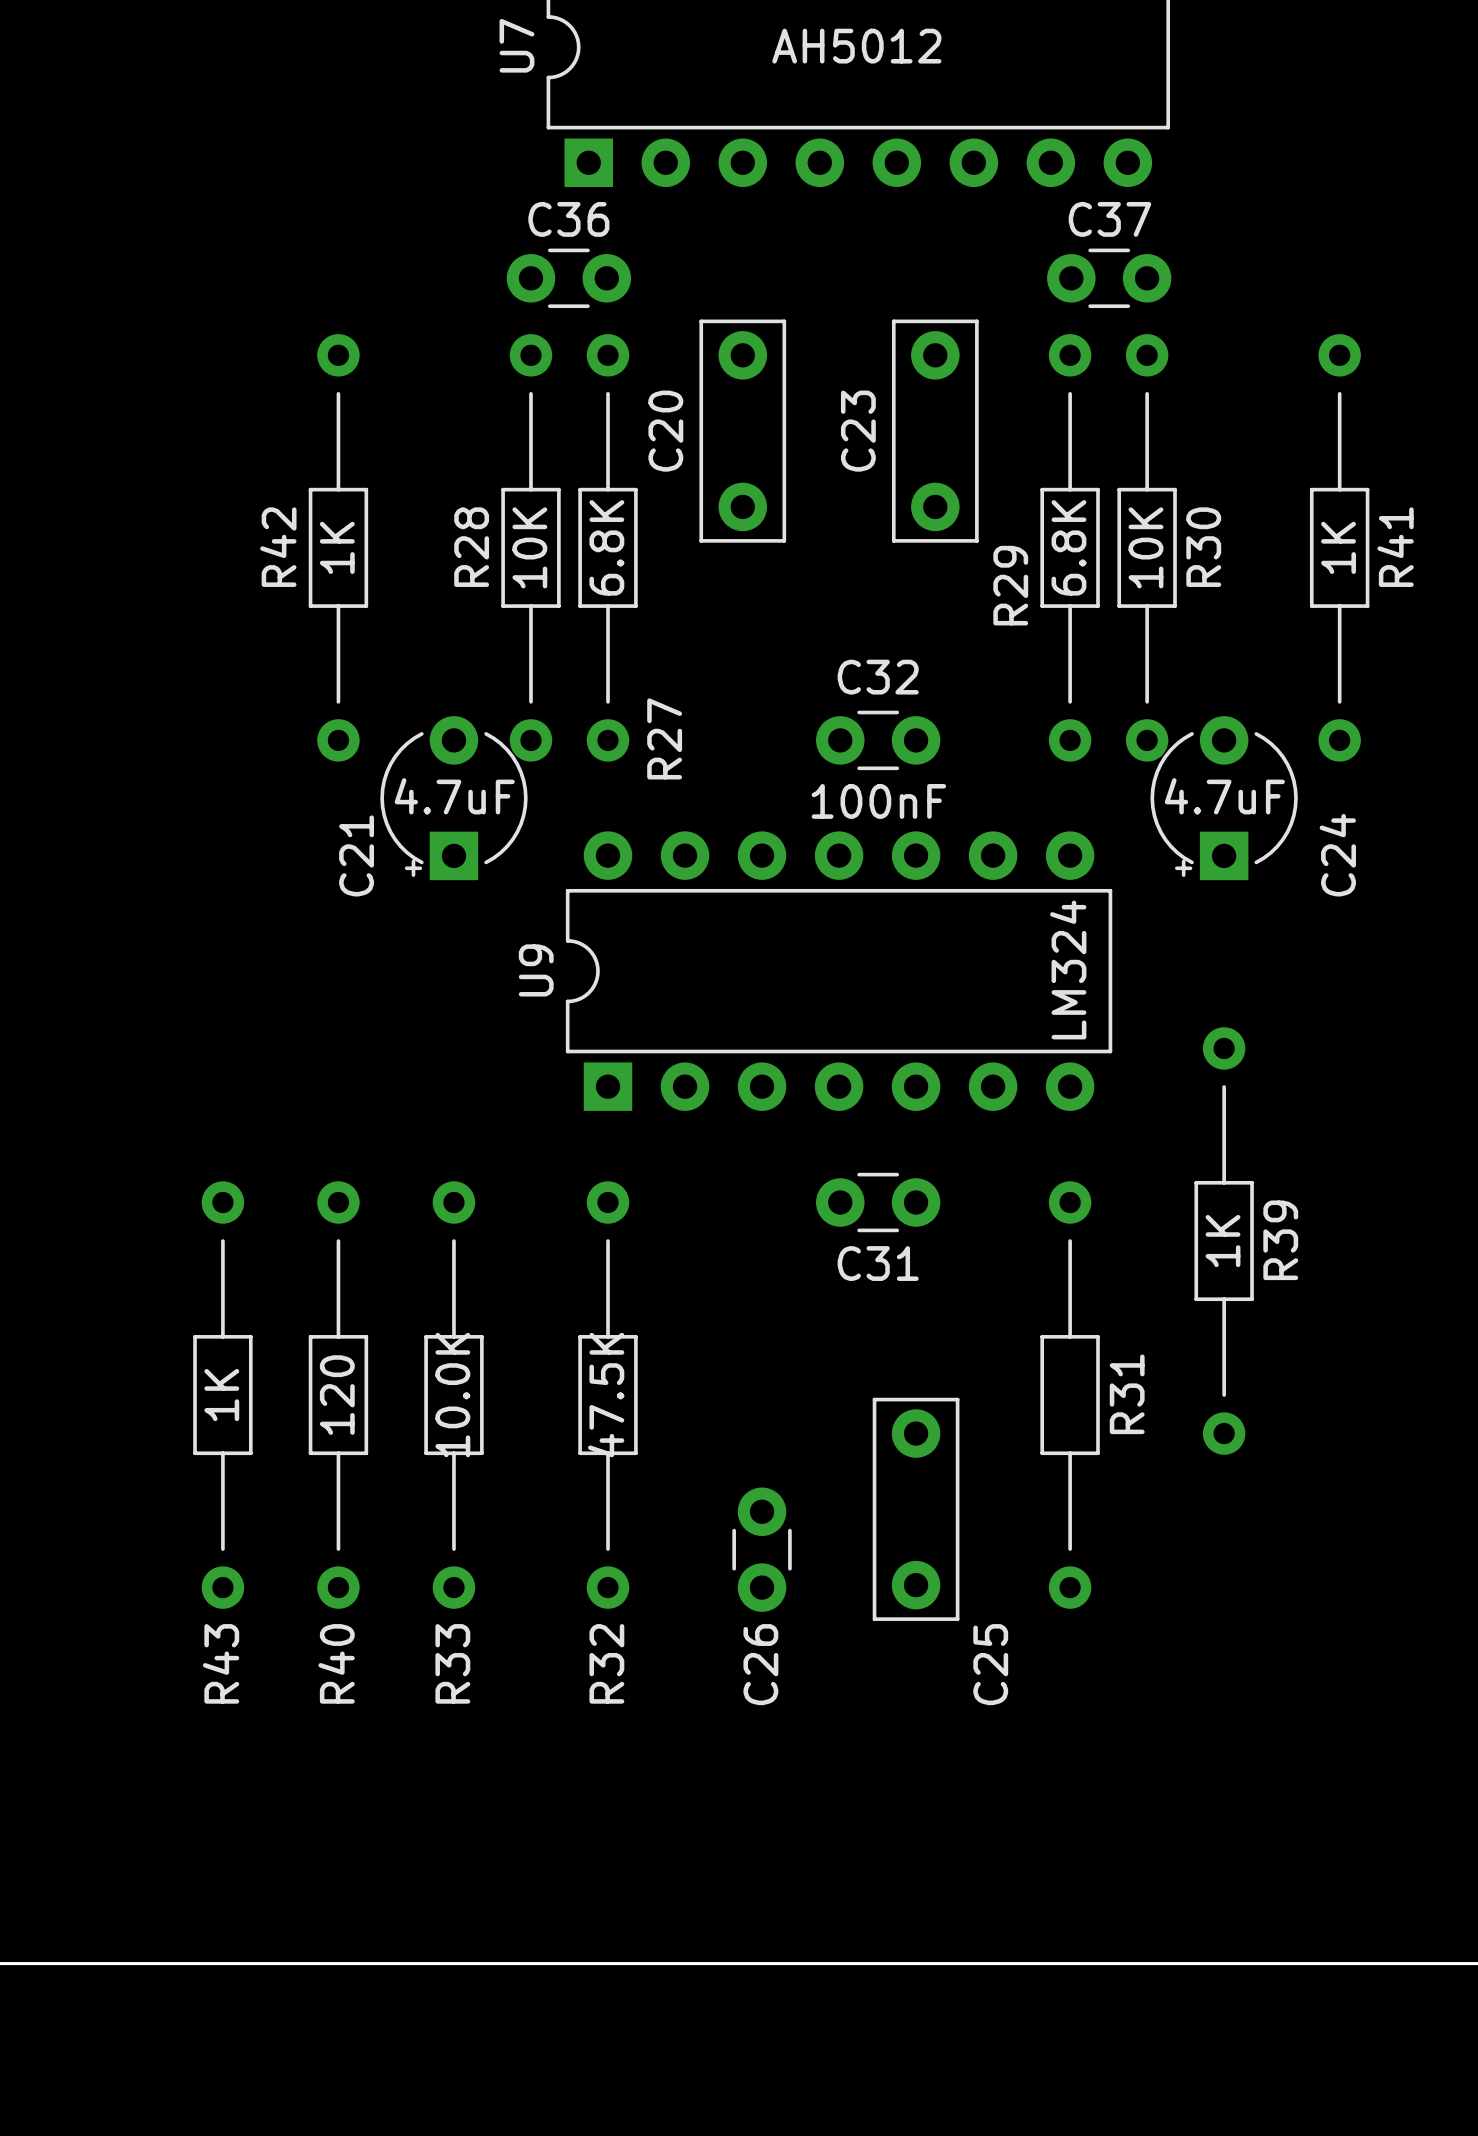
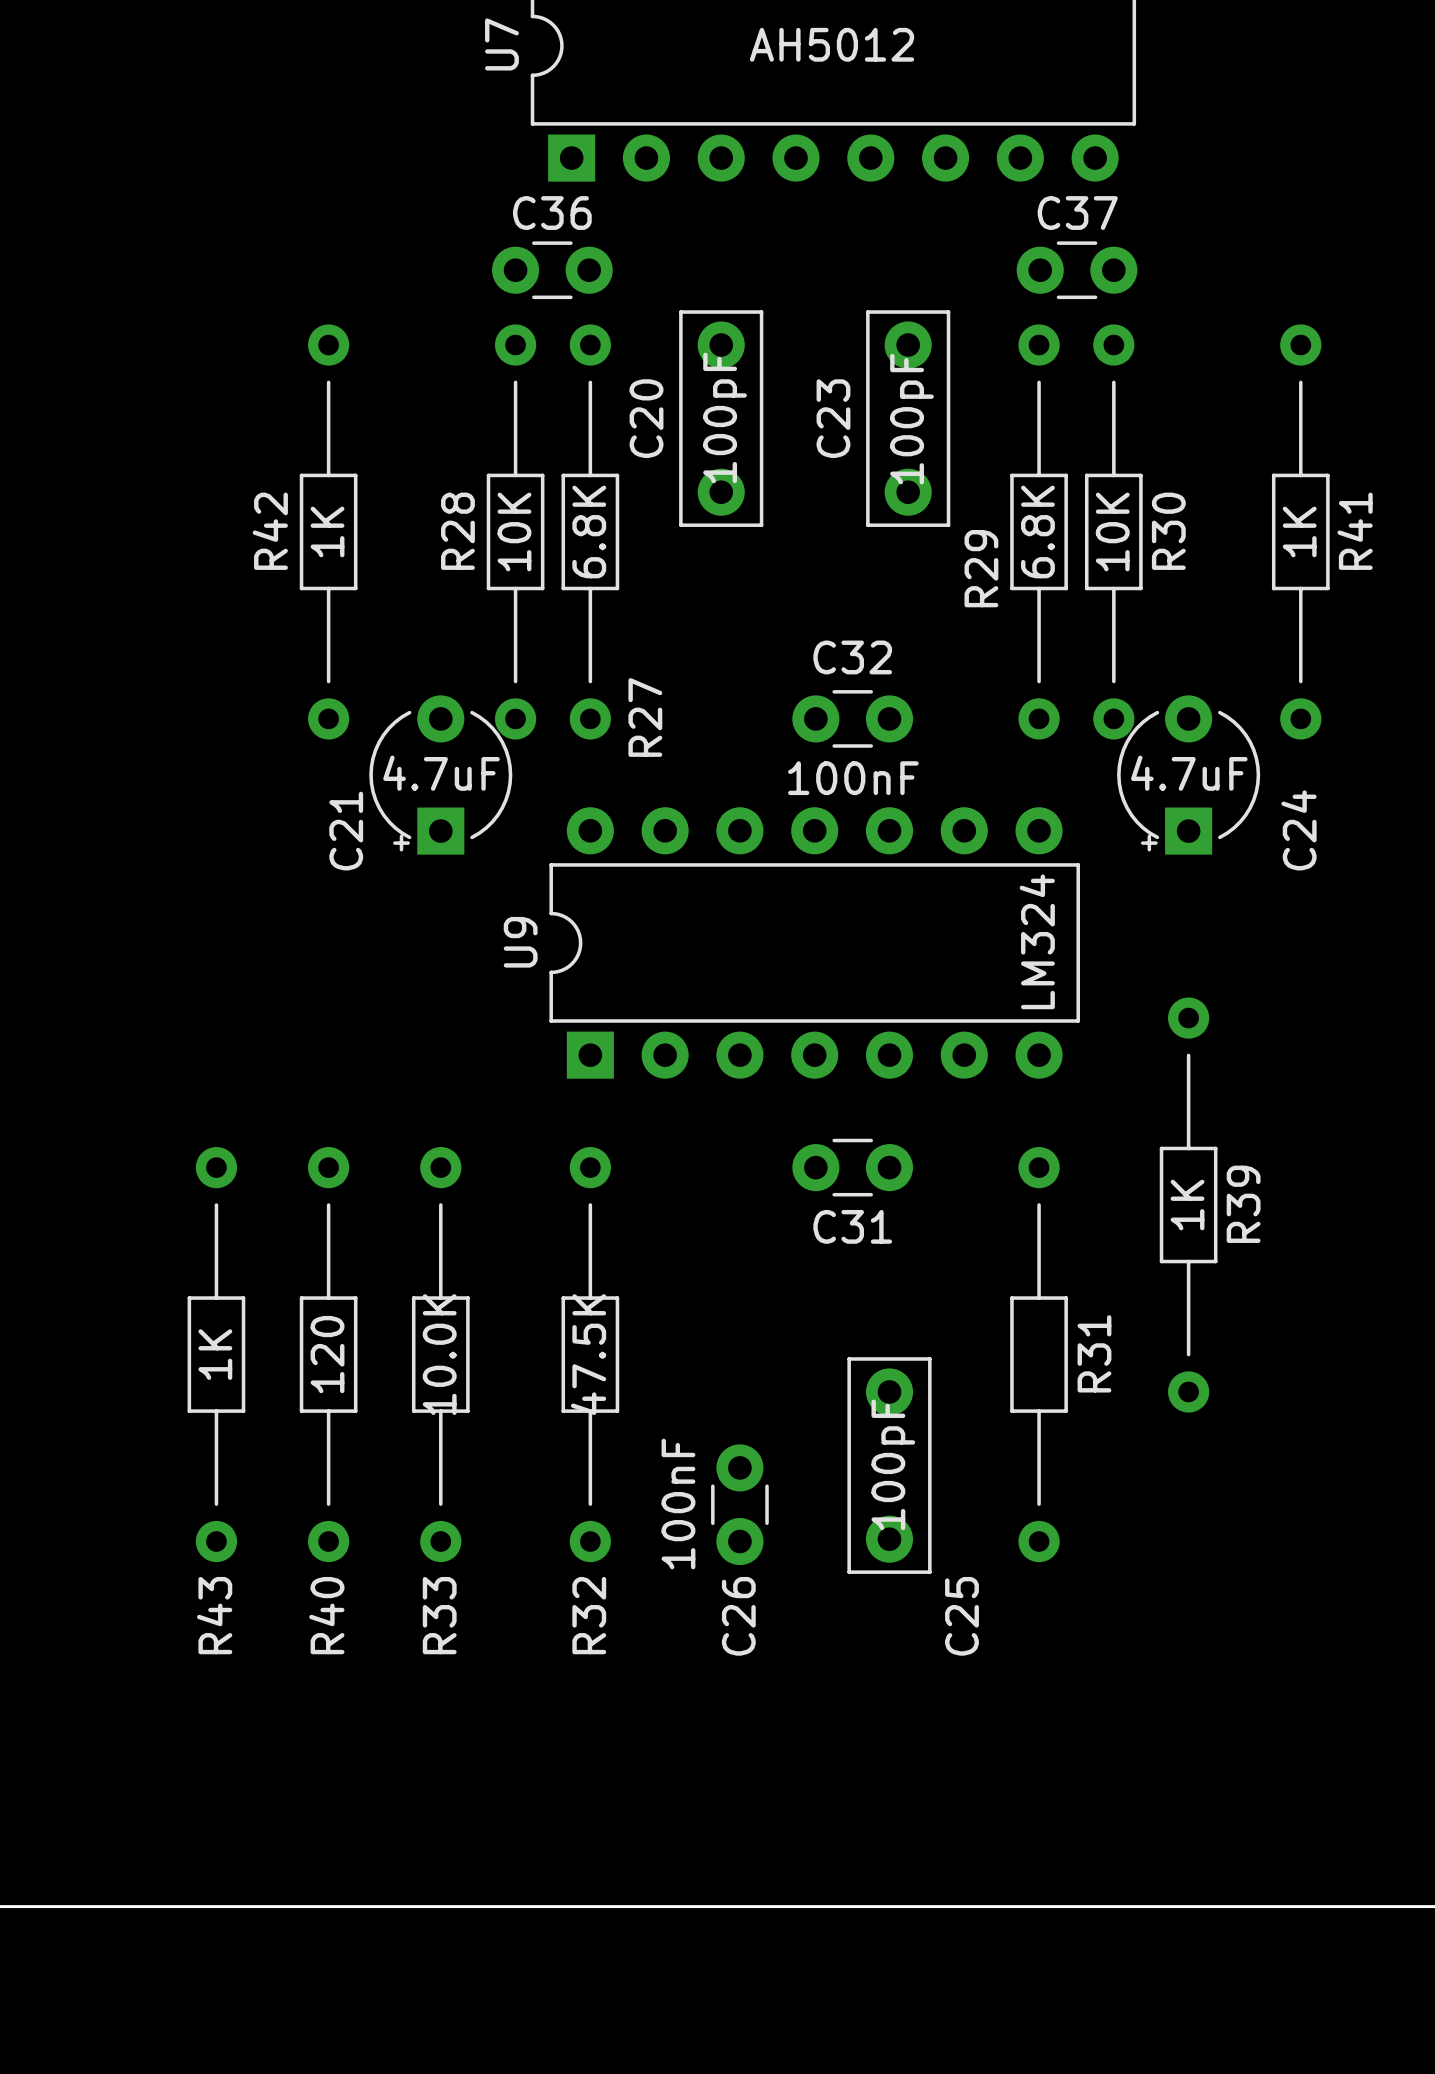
C20 value: none -> 100pF (725, 417)
C23 value: none -> 100pF (911, 419)
C25 value: none -> 100pF (893, 1464)
C26 value: none -> 100nF (678, 1504)

